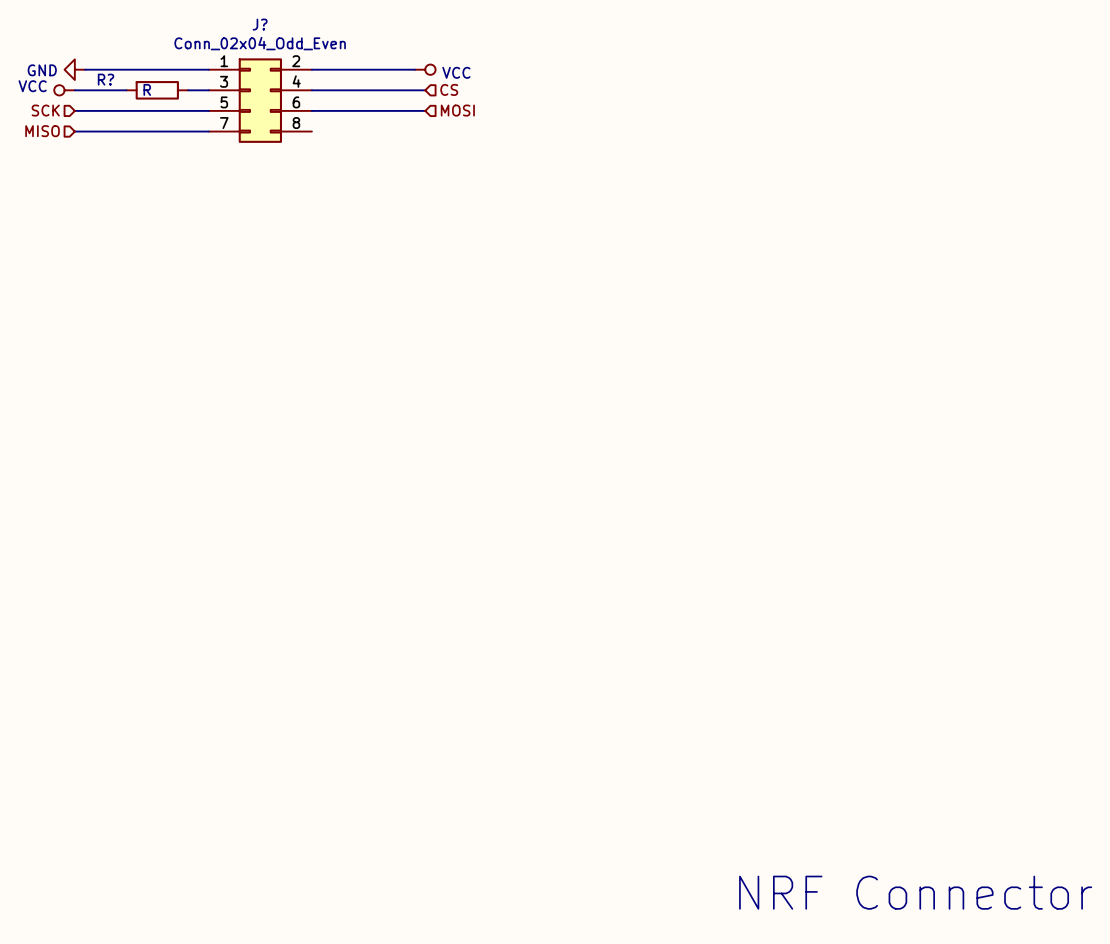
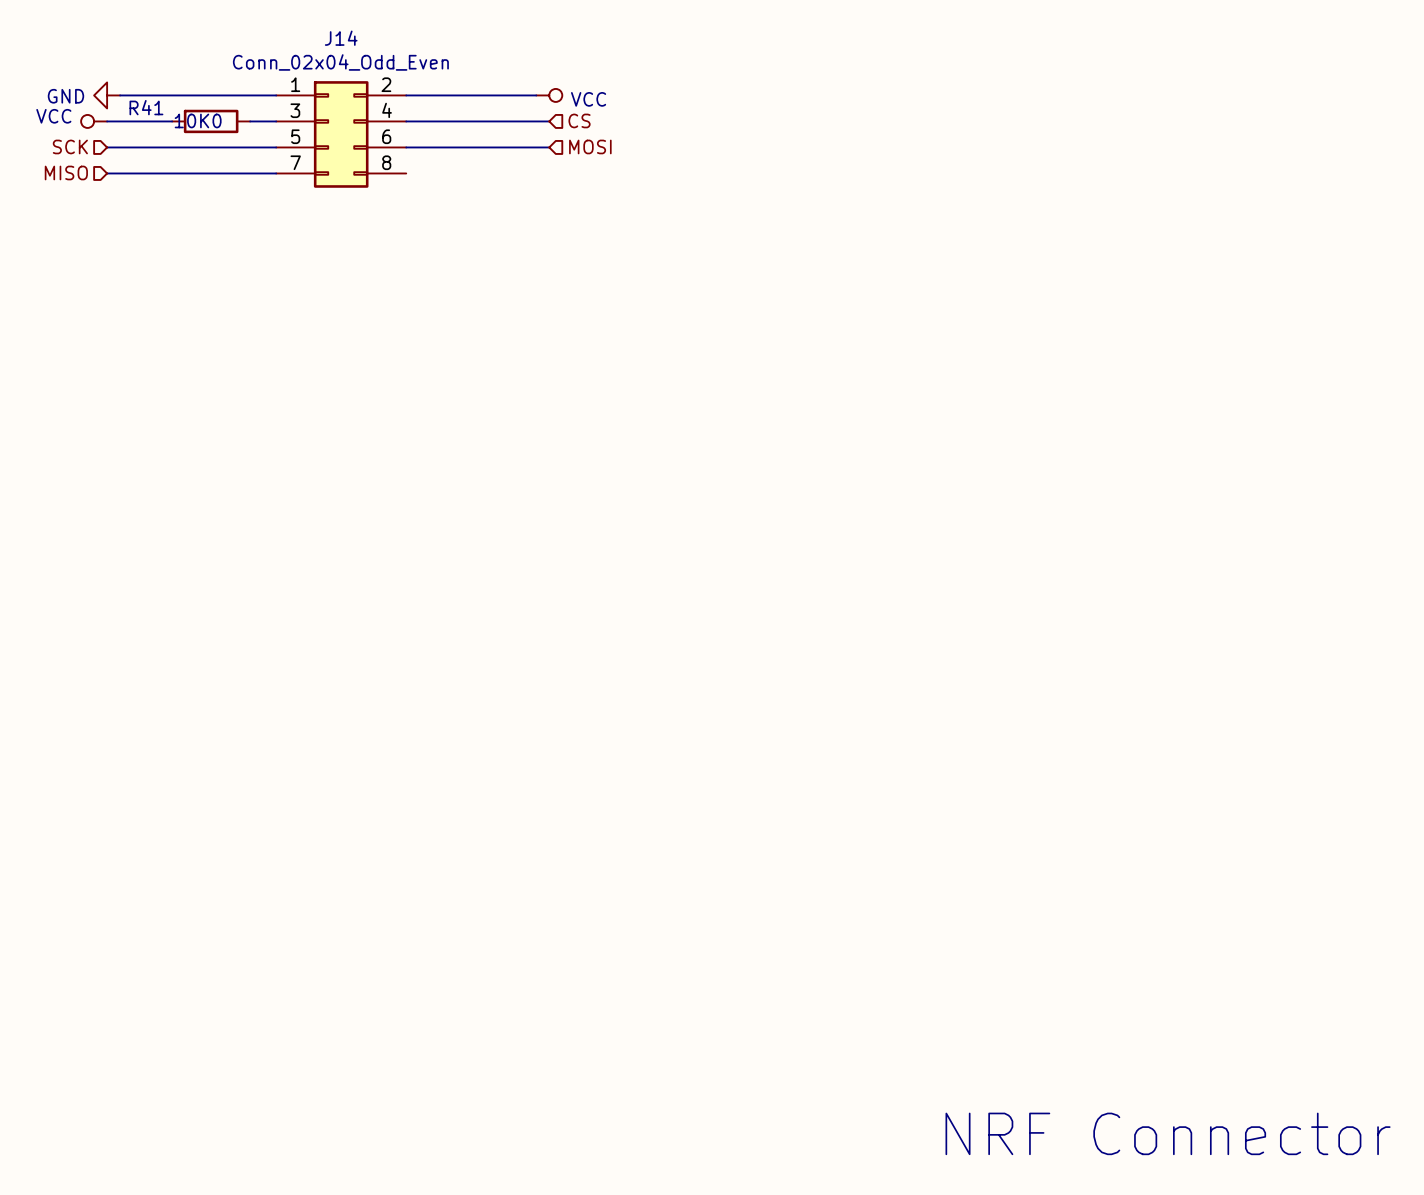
J? name: J? (260, 24) -> J14 (341, 38)
R? name: R? (106, 79) -> R41 (146, 107)
R? value: R (147, 89) -> 10K0 (198, 120)

